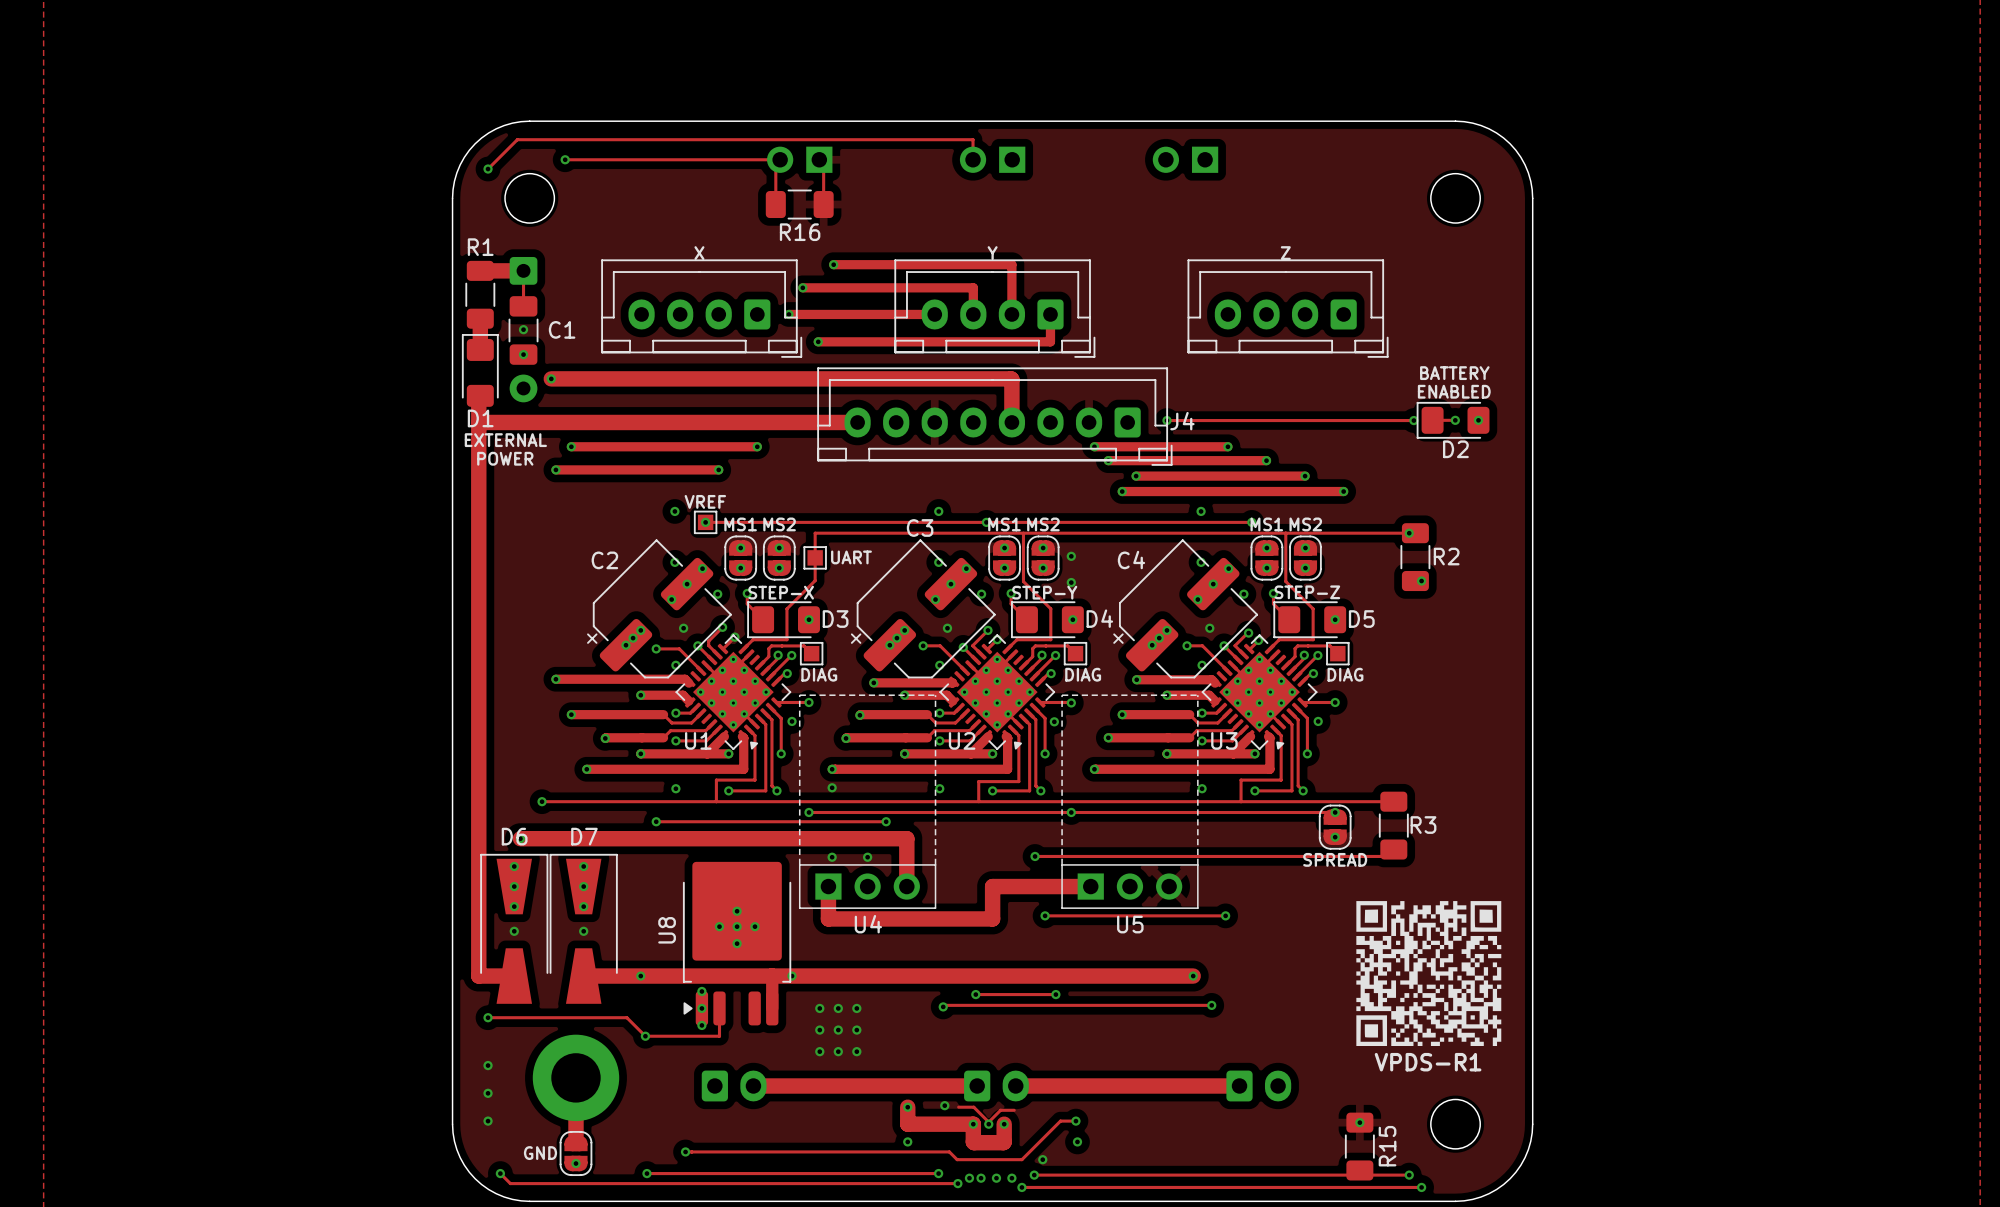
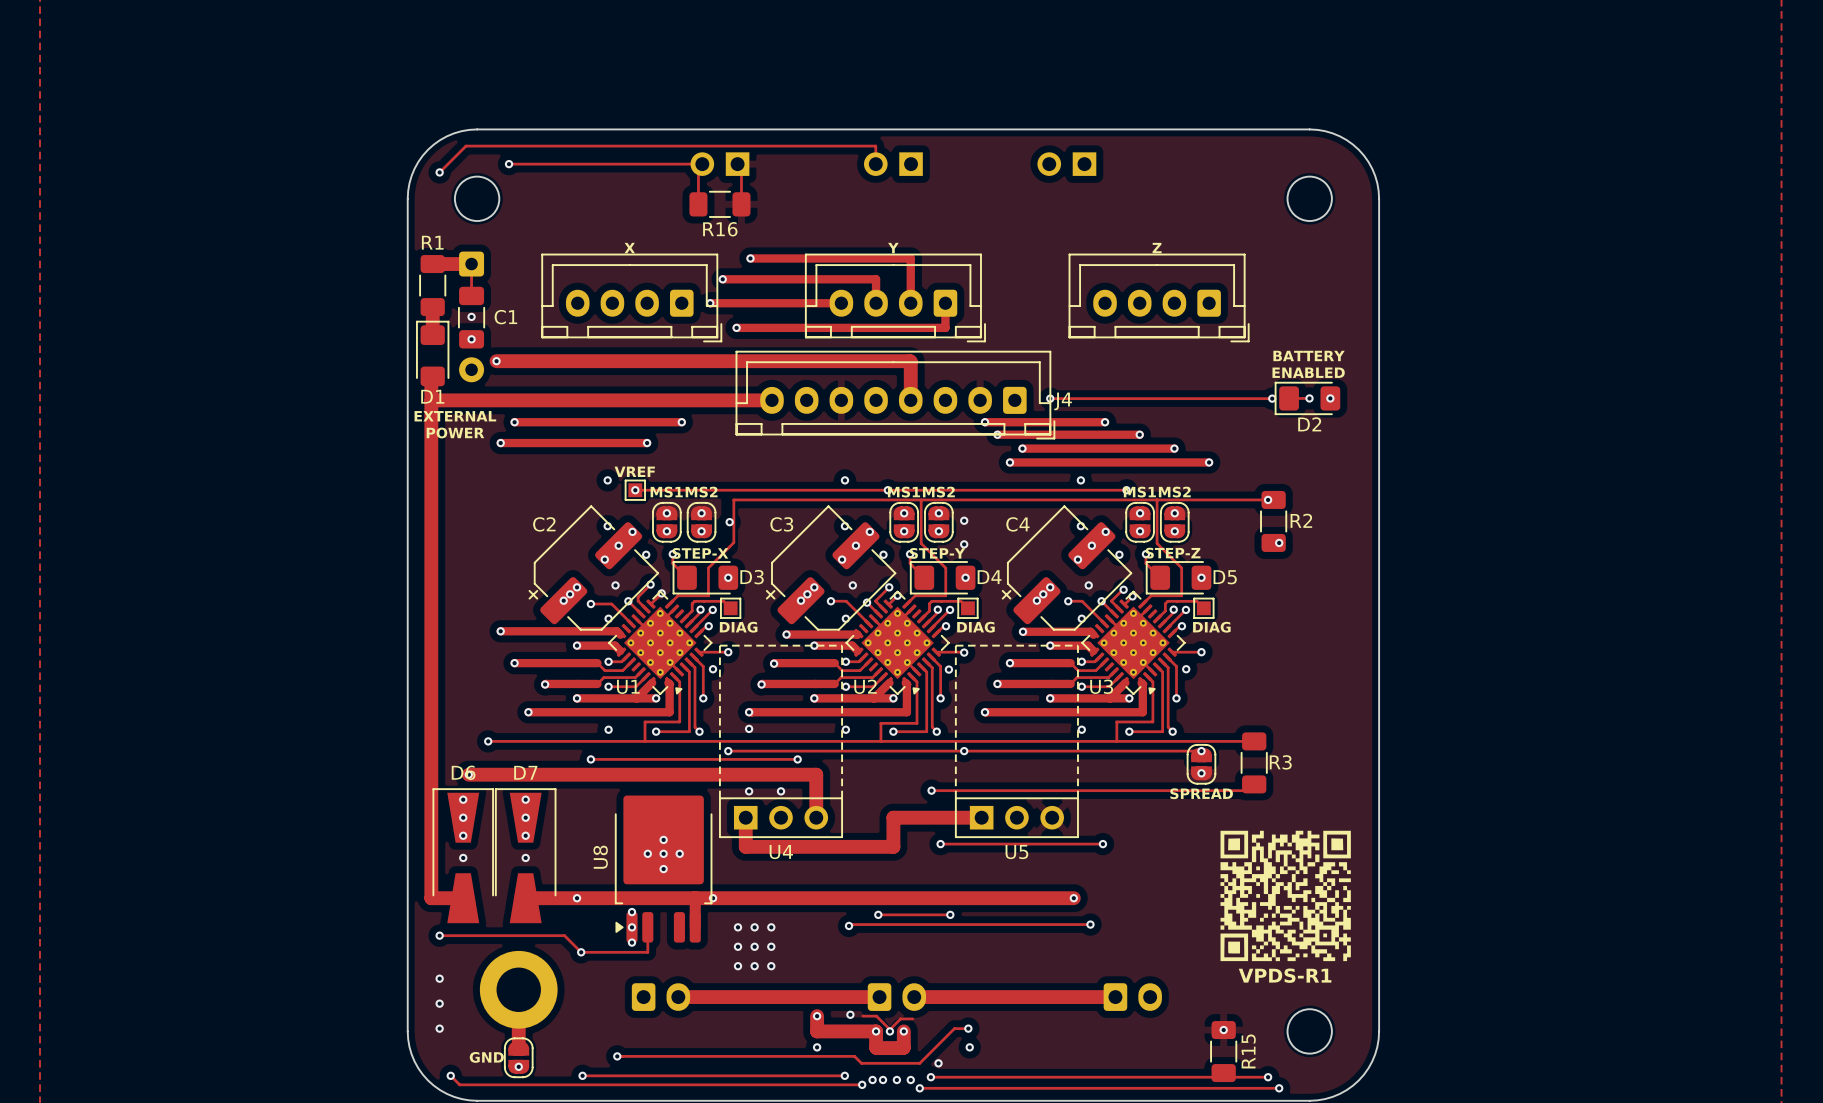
C3 name position: C3 (920, 527) -> C3 (781, 524)
via: none -> (729, 522)
part: (815, 557) -> none
text: UART (851, 557) -> none

